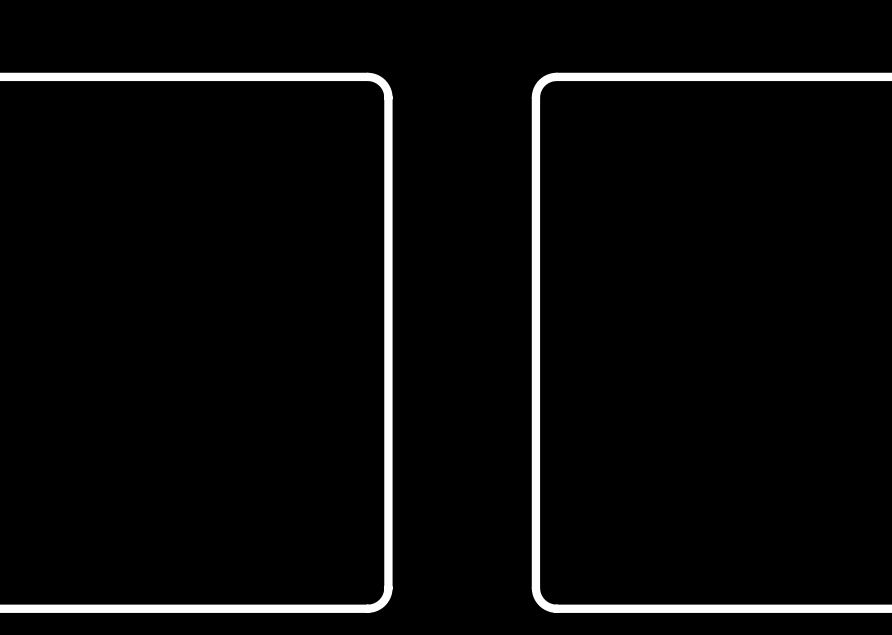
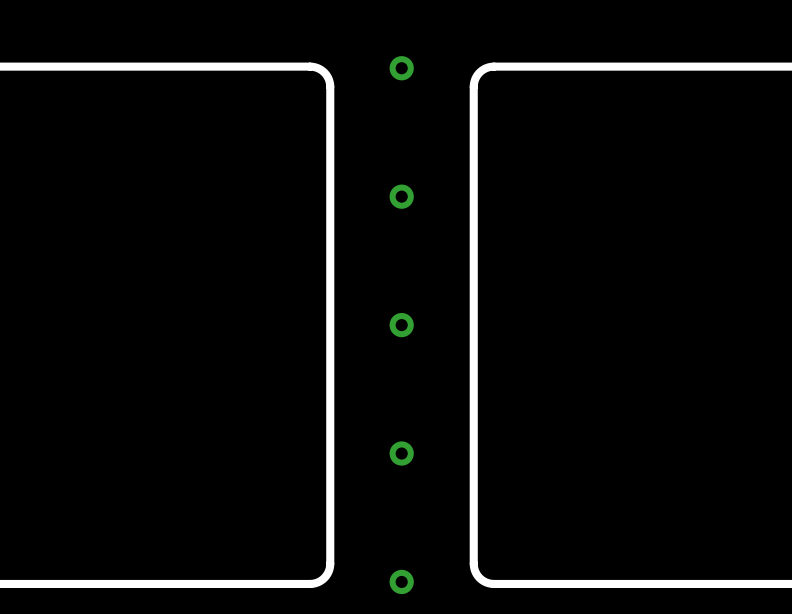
via: none -> (401, 68)
via: none -> (401, 196)
via: none -> (401, 325)
via: none -> (401, 453)
via: none -> (401, 581)

